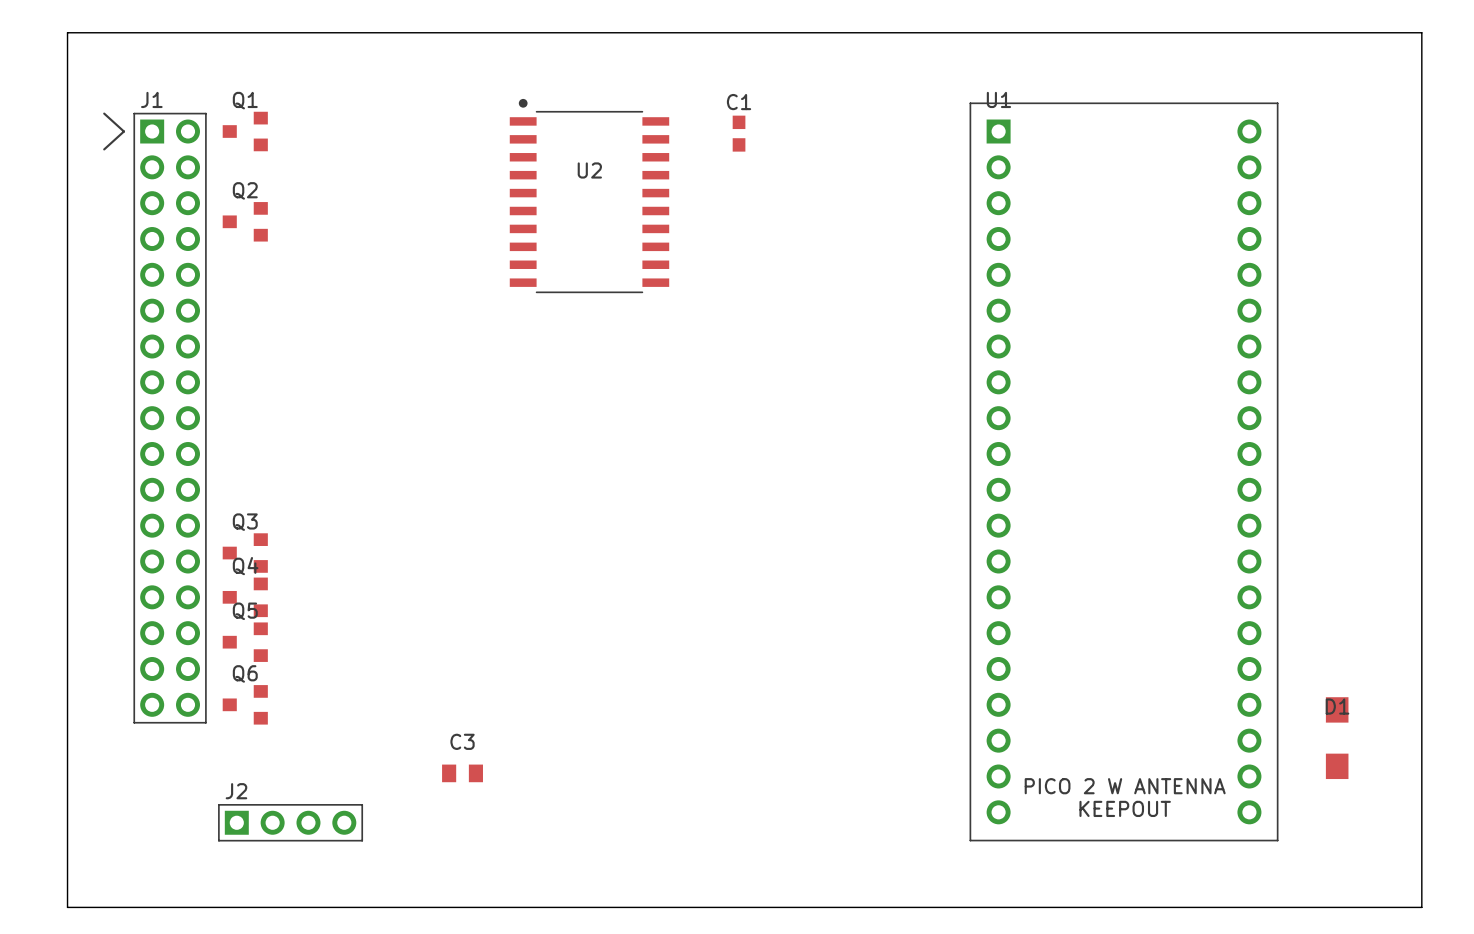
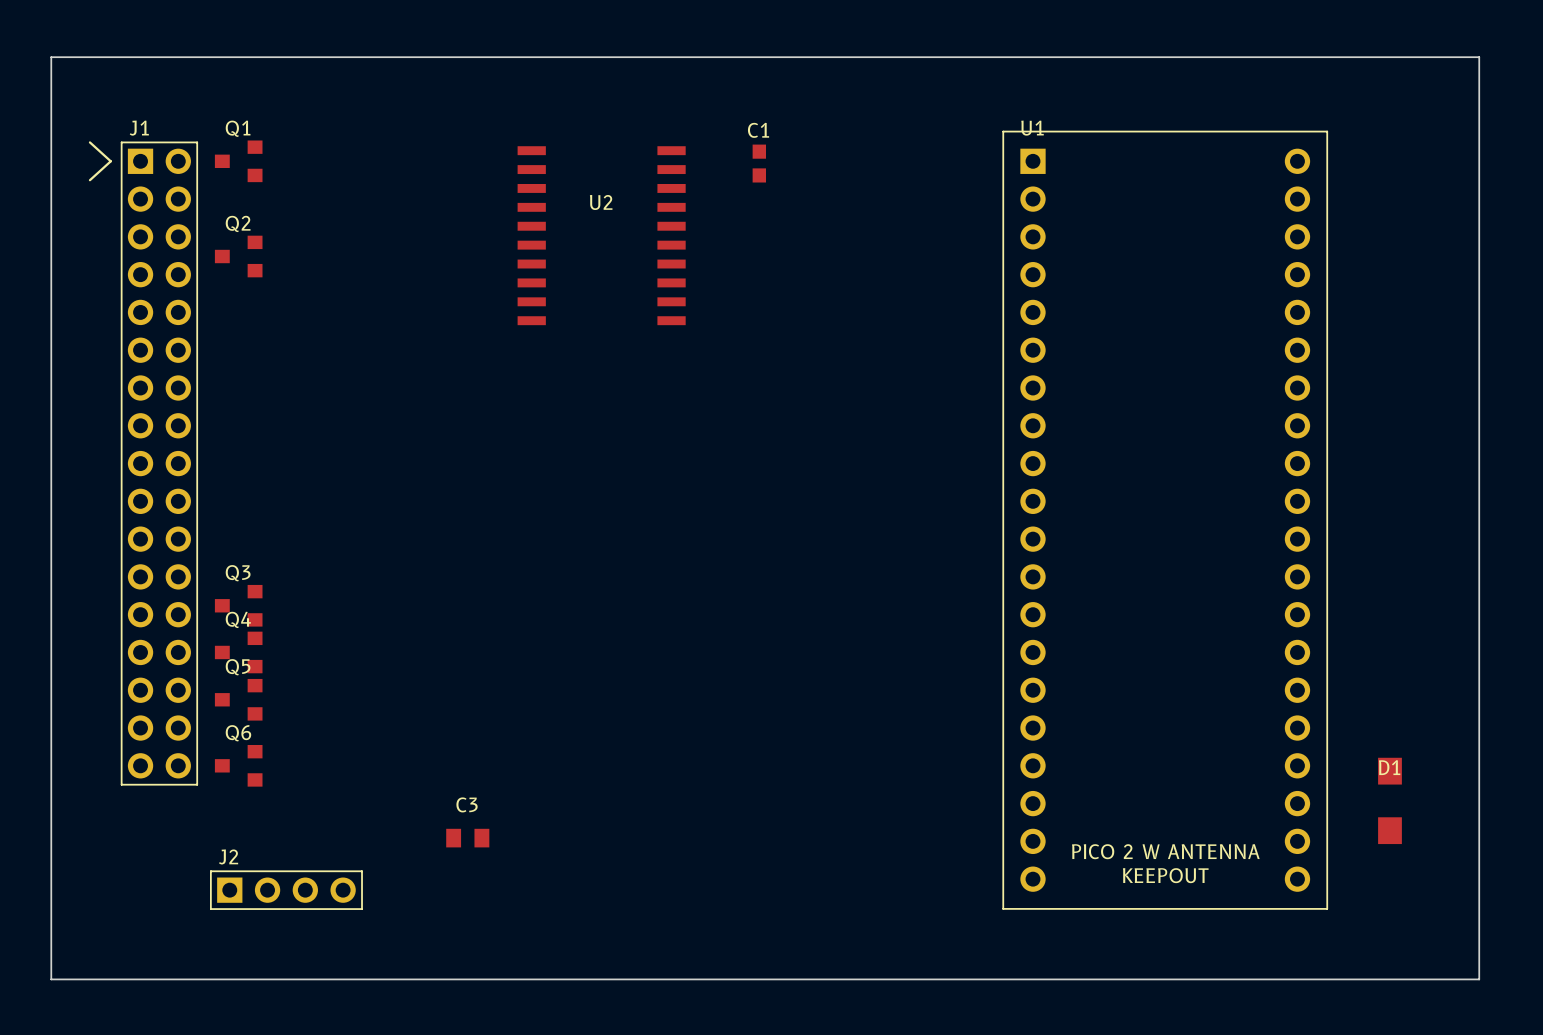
U2 footprint: [509, 98, 670, 294] -> [517, 146, 686, 326]

